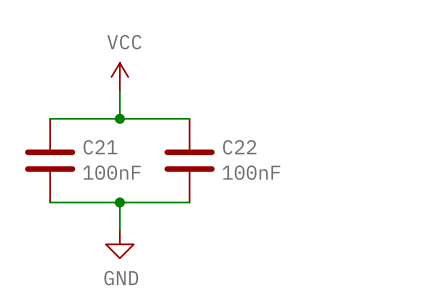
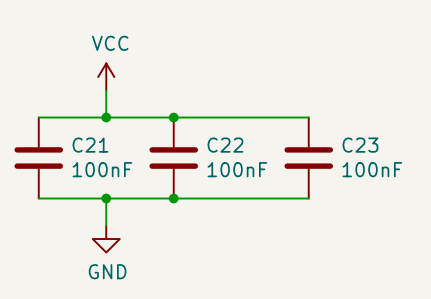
wire: none -> (173, 117) (308, 117)
junction: none -> (173, 117)
C23: none -> 100nF (308, 158)
wire: none -> (173, 198) (308, 198)
junction: none -> (173, 198)

